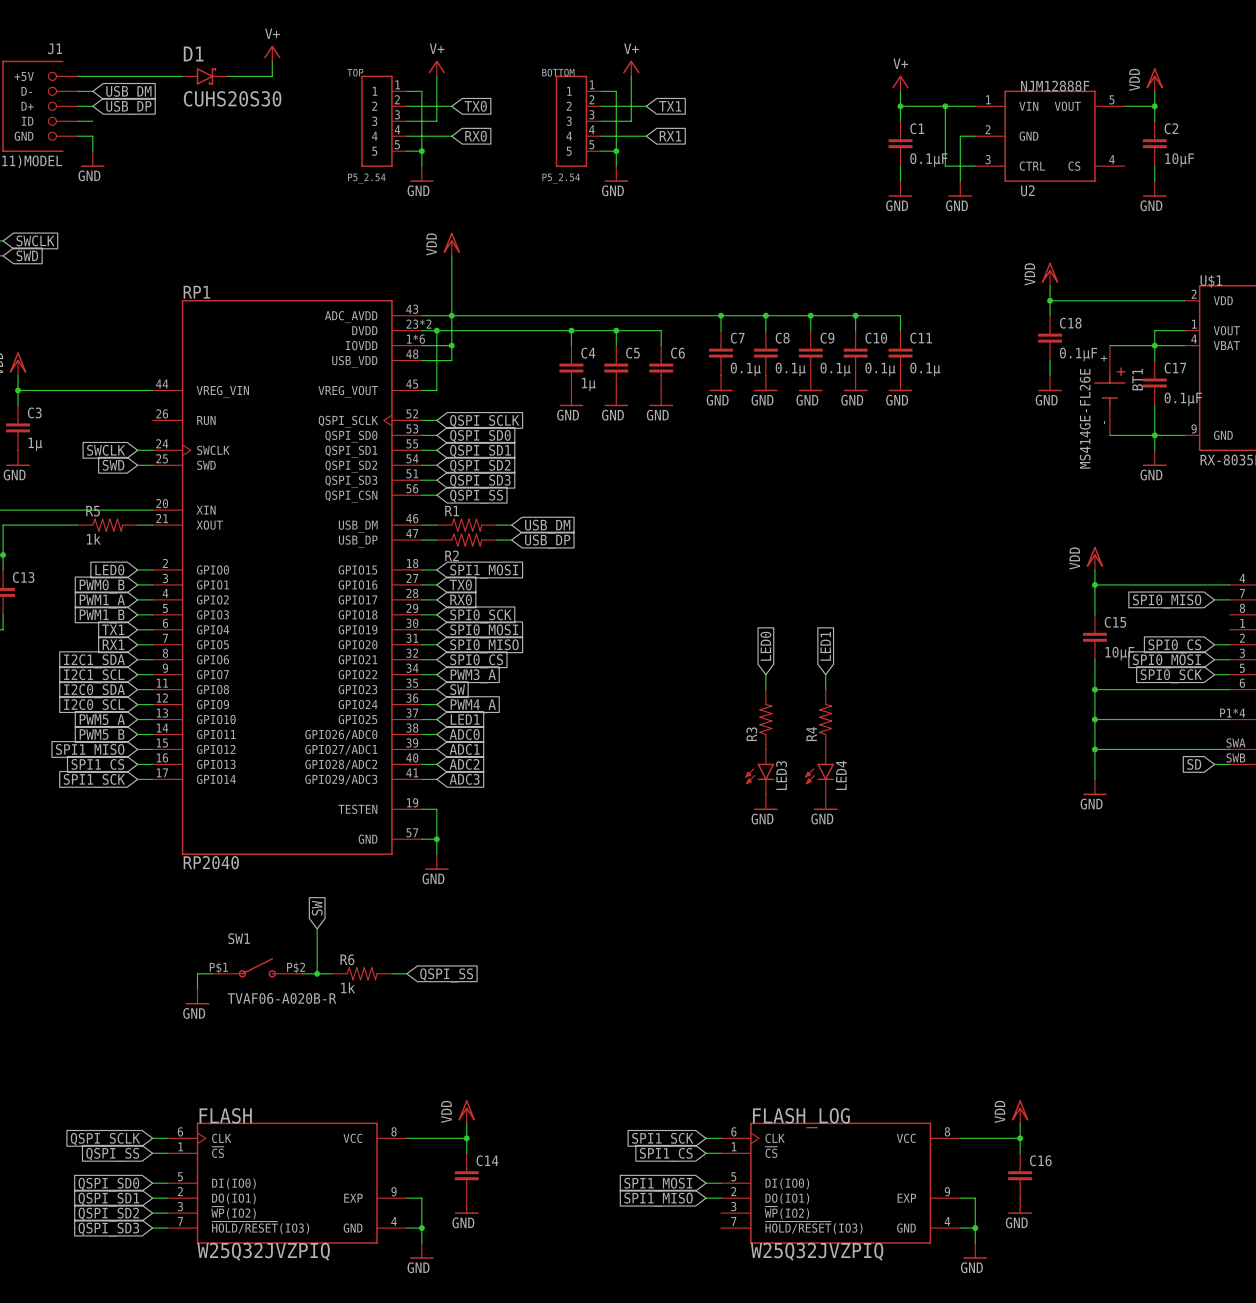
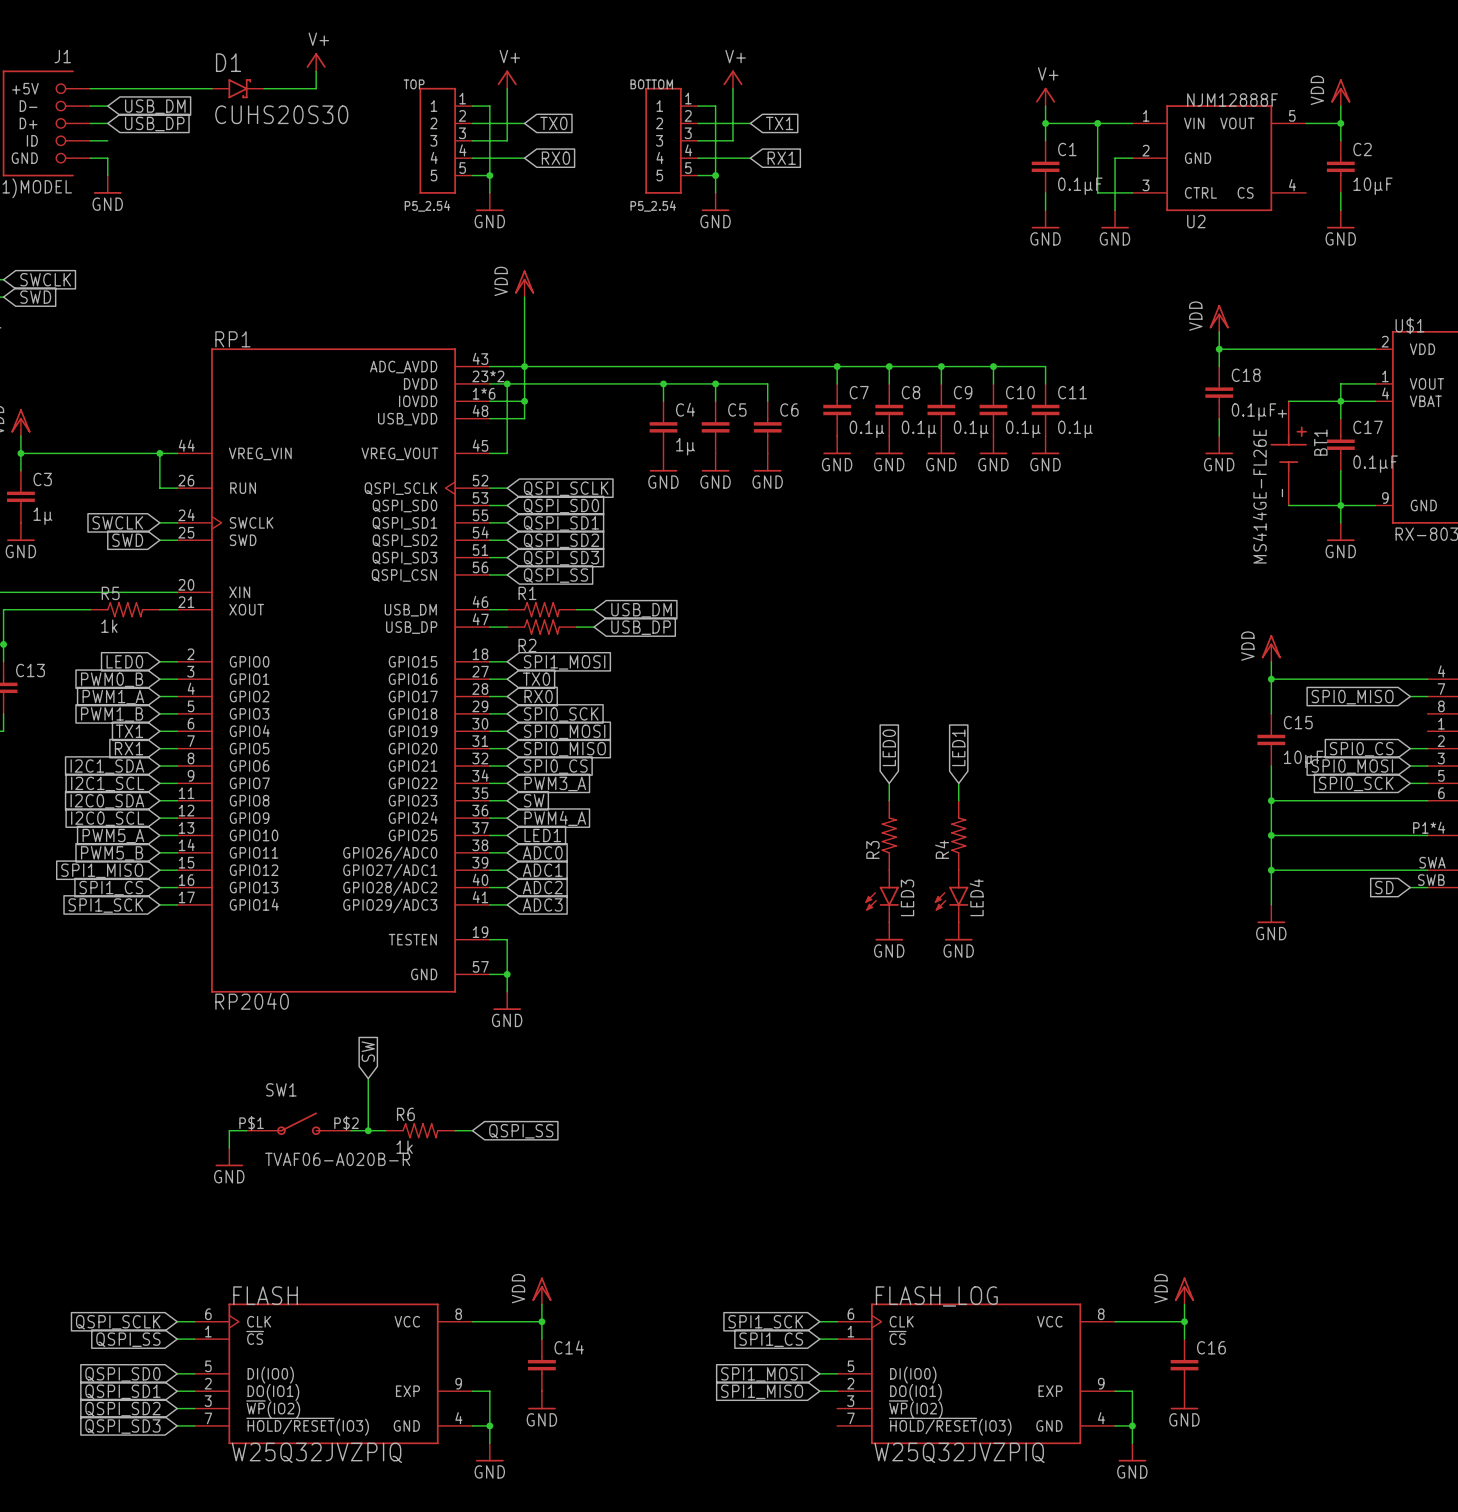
wire: none -> (159, 453) (159, 488) (177, 488)
junction: none -> (159, 453)

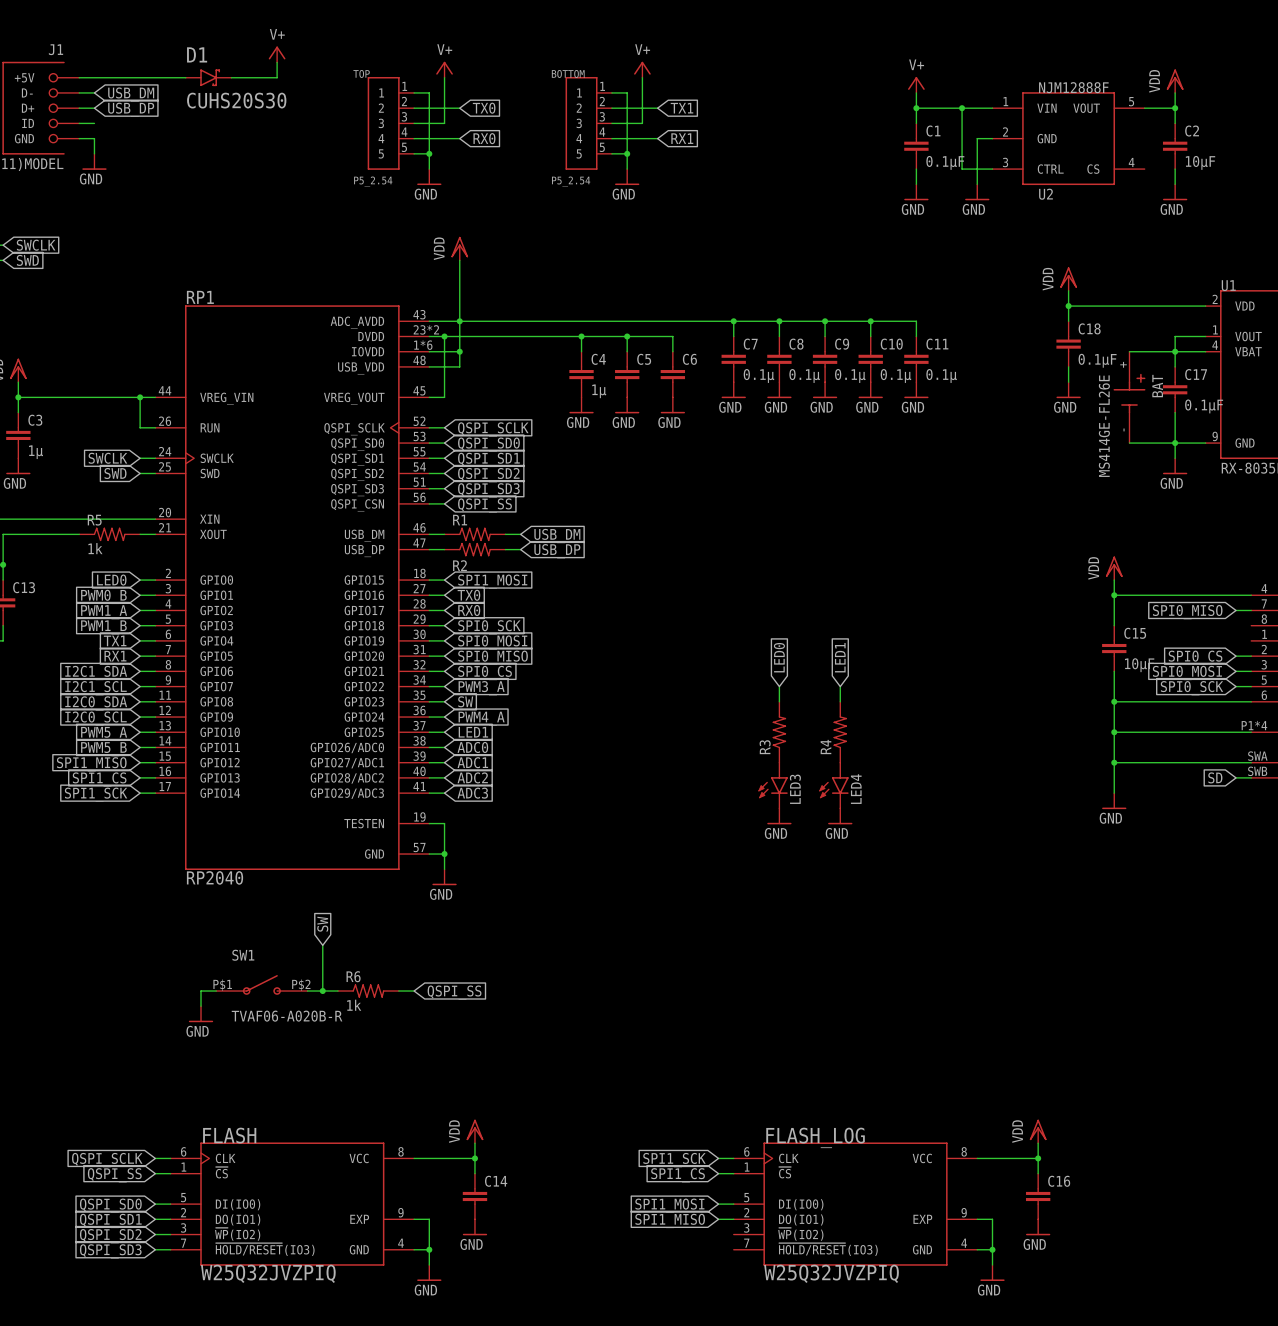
U$1 name: U$1 (1409, 325) -> U1 (1228, 285)
BT1 name: BT1 (1320, 442) -> BAT (1157, 386)

